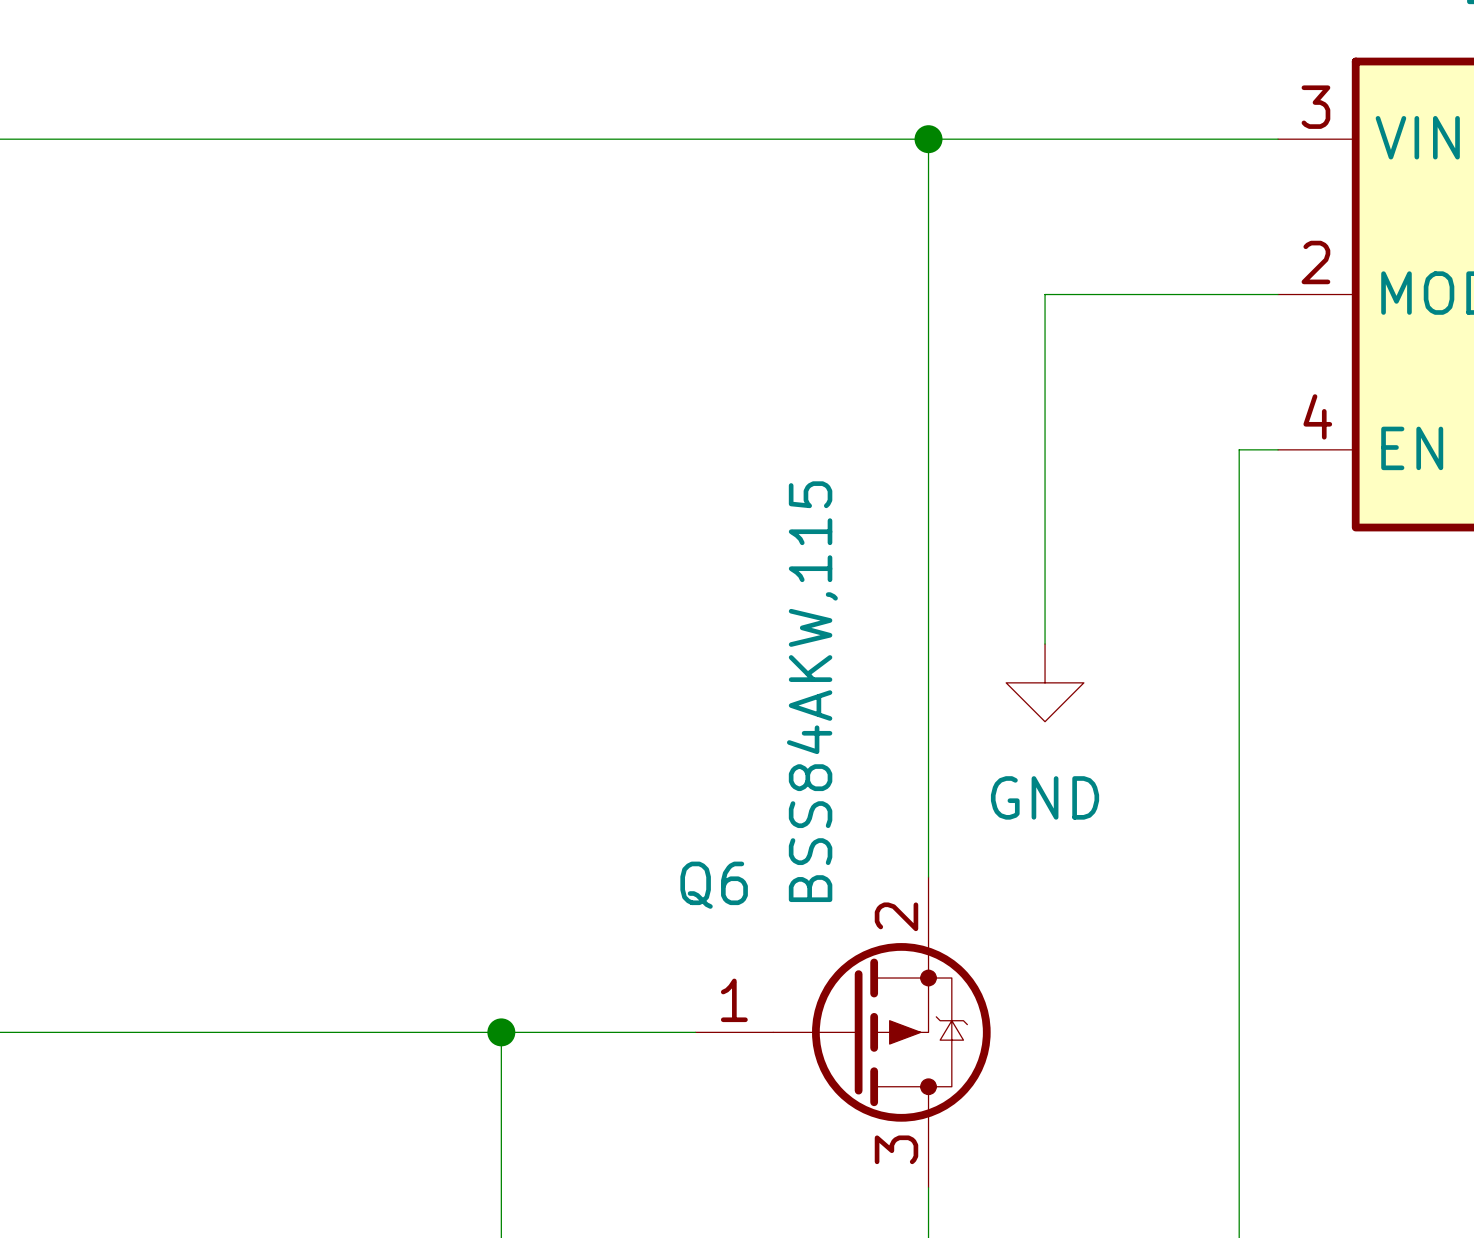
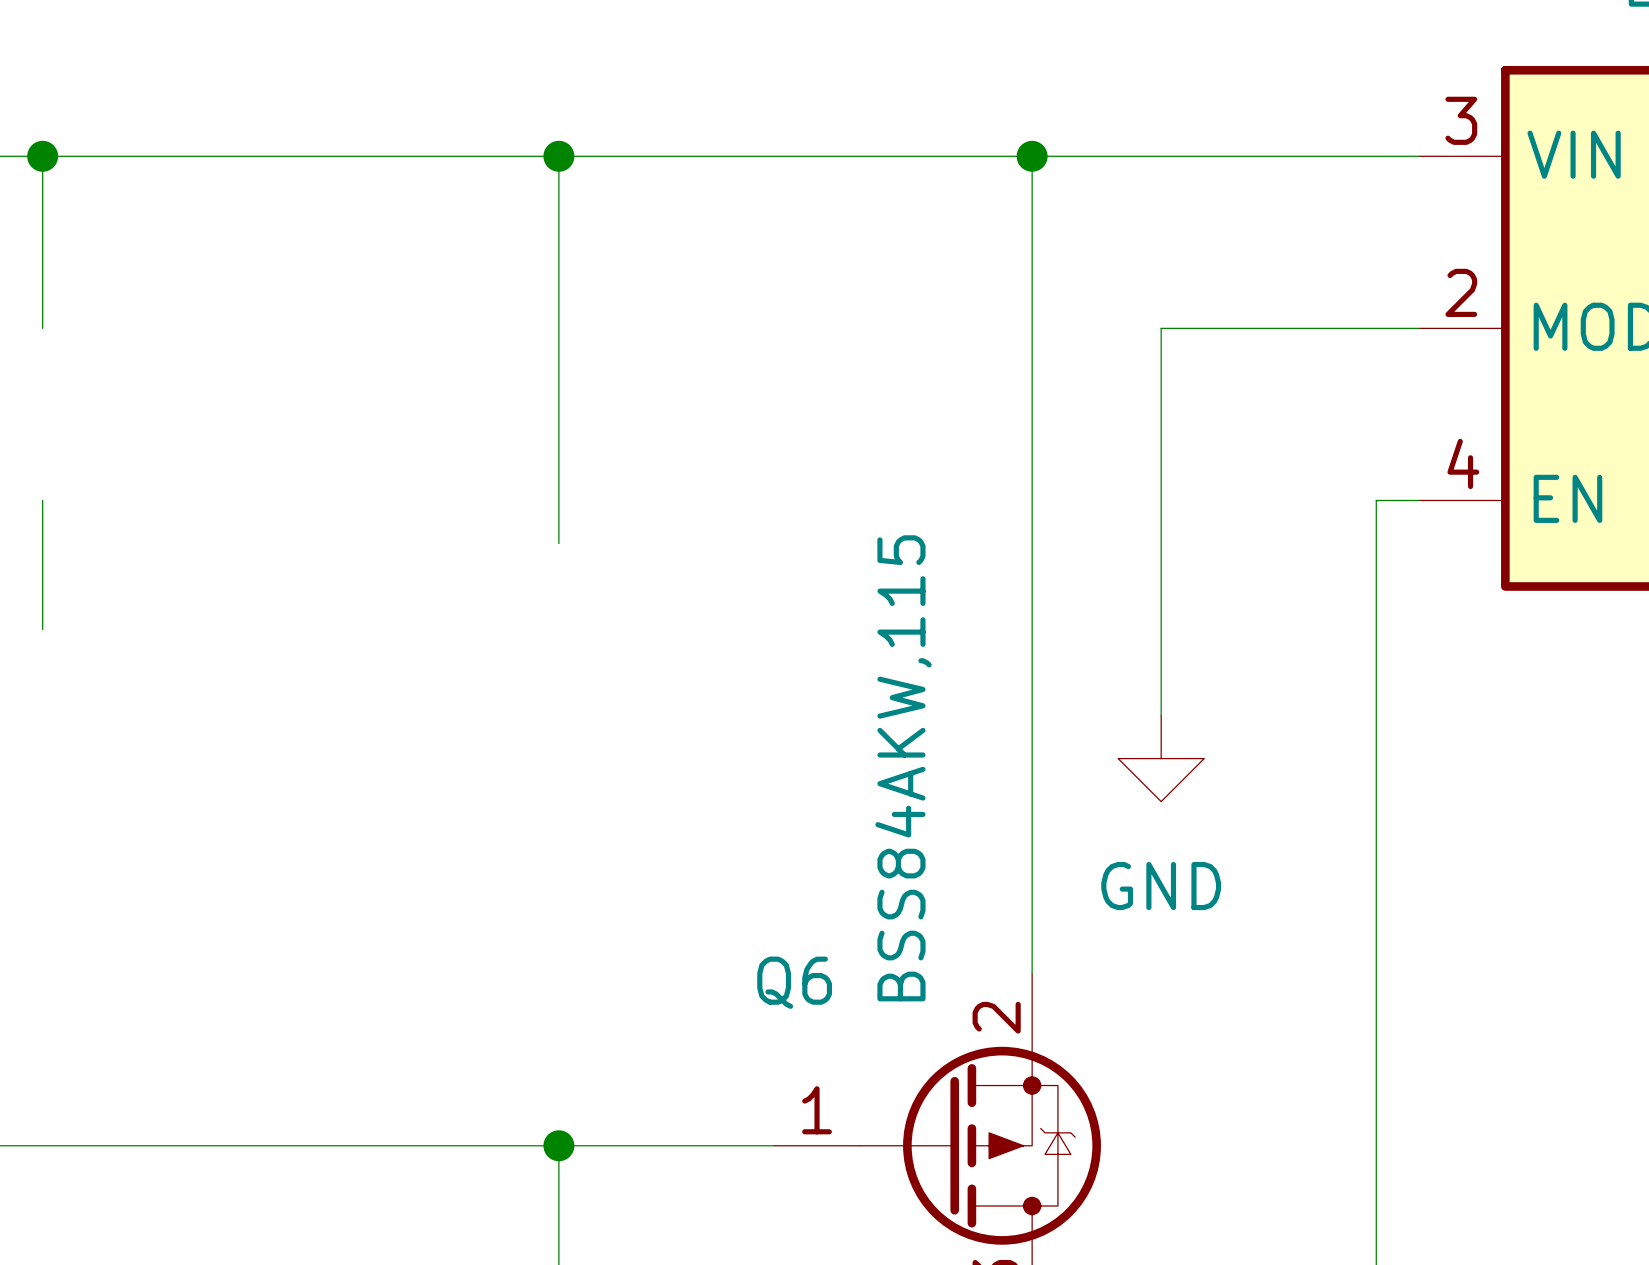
wire: none -> (42, 156) (42, 328)
junction: none -> (42, 156)
wire: none -> (558, 156) (558, 543)
junction: none -> (558, 156)
wire: none -> (42, 500) (42, 629)

